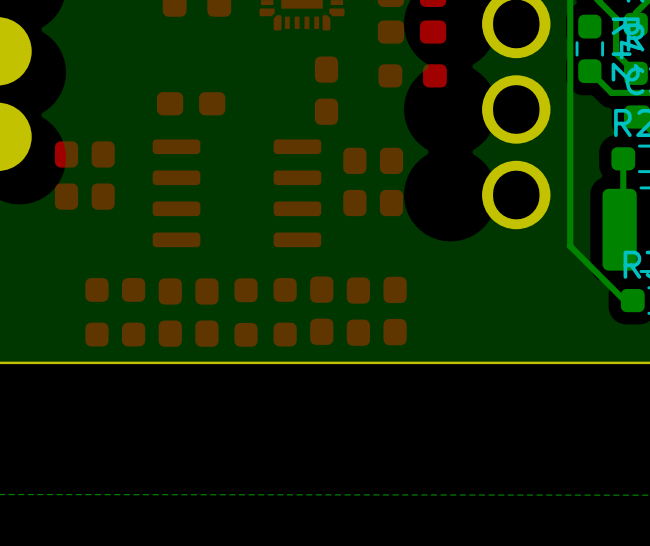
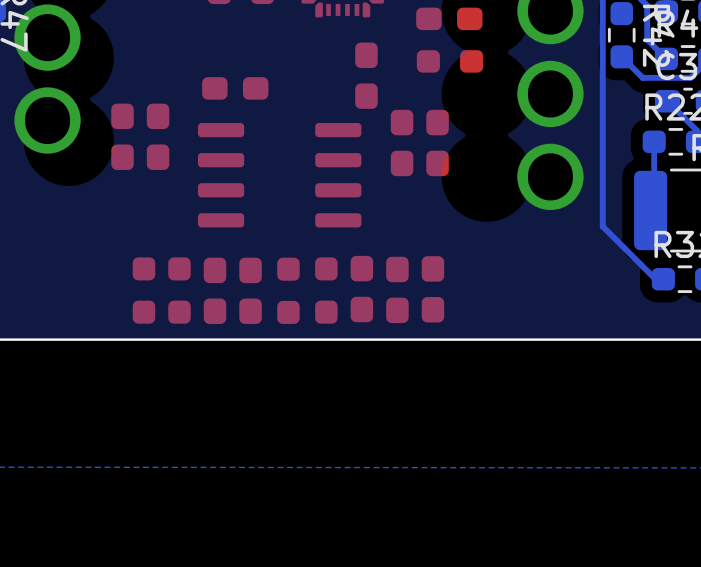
part: none -> (122, 136)
part: none -> (158, 136)
part: none -> (402, 143)
part: none -> (437, 143)
part: (66, 175) -> none
part: (103, 175) -> none
part: (354, 181) -> none
part: (391, 181) -> none

